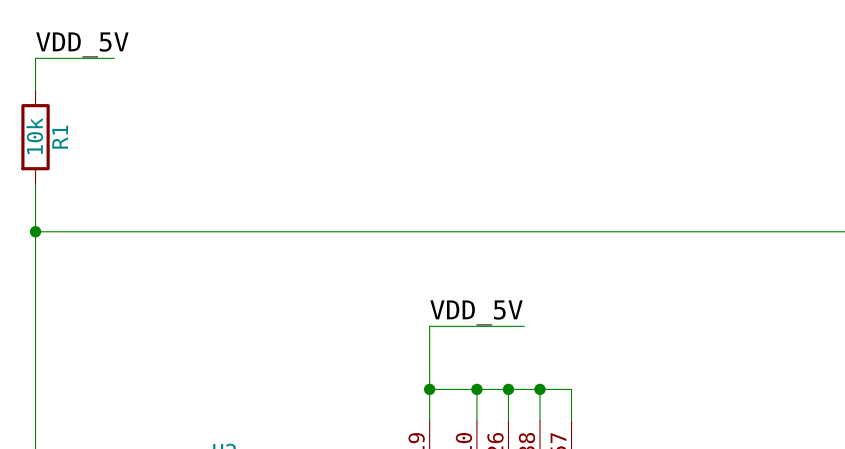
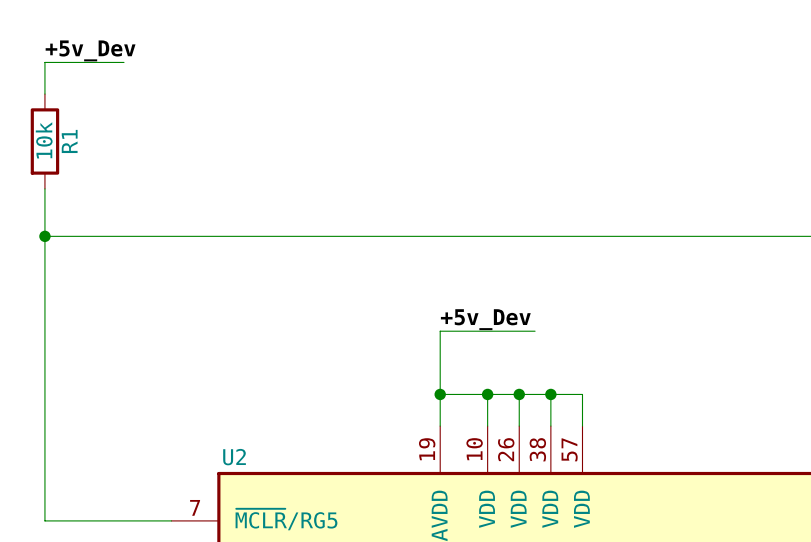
label: VDD_5V (82, 44) -> +5v_Dev (90, 50)
label: VDD_5V (476, 312) -> +5v_Dev (485, 319)

